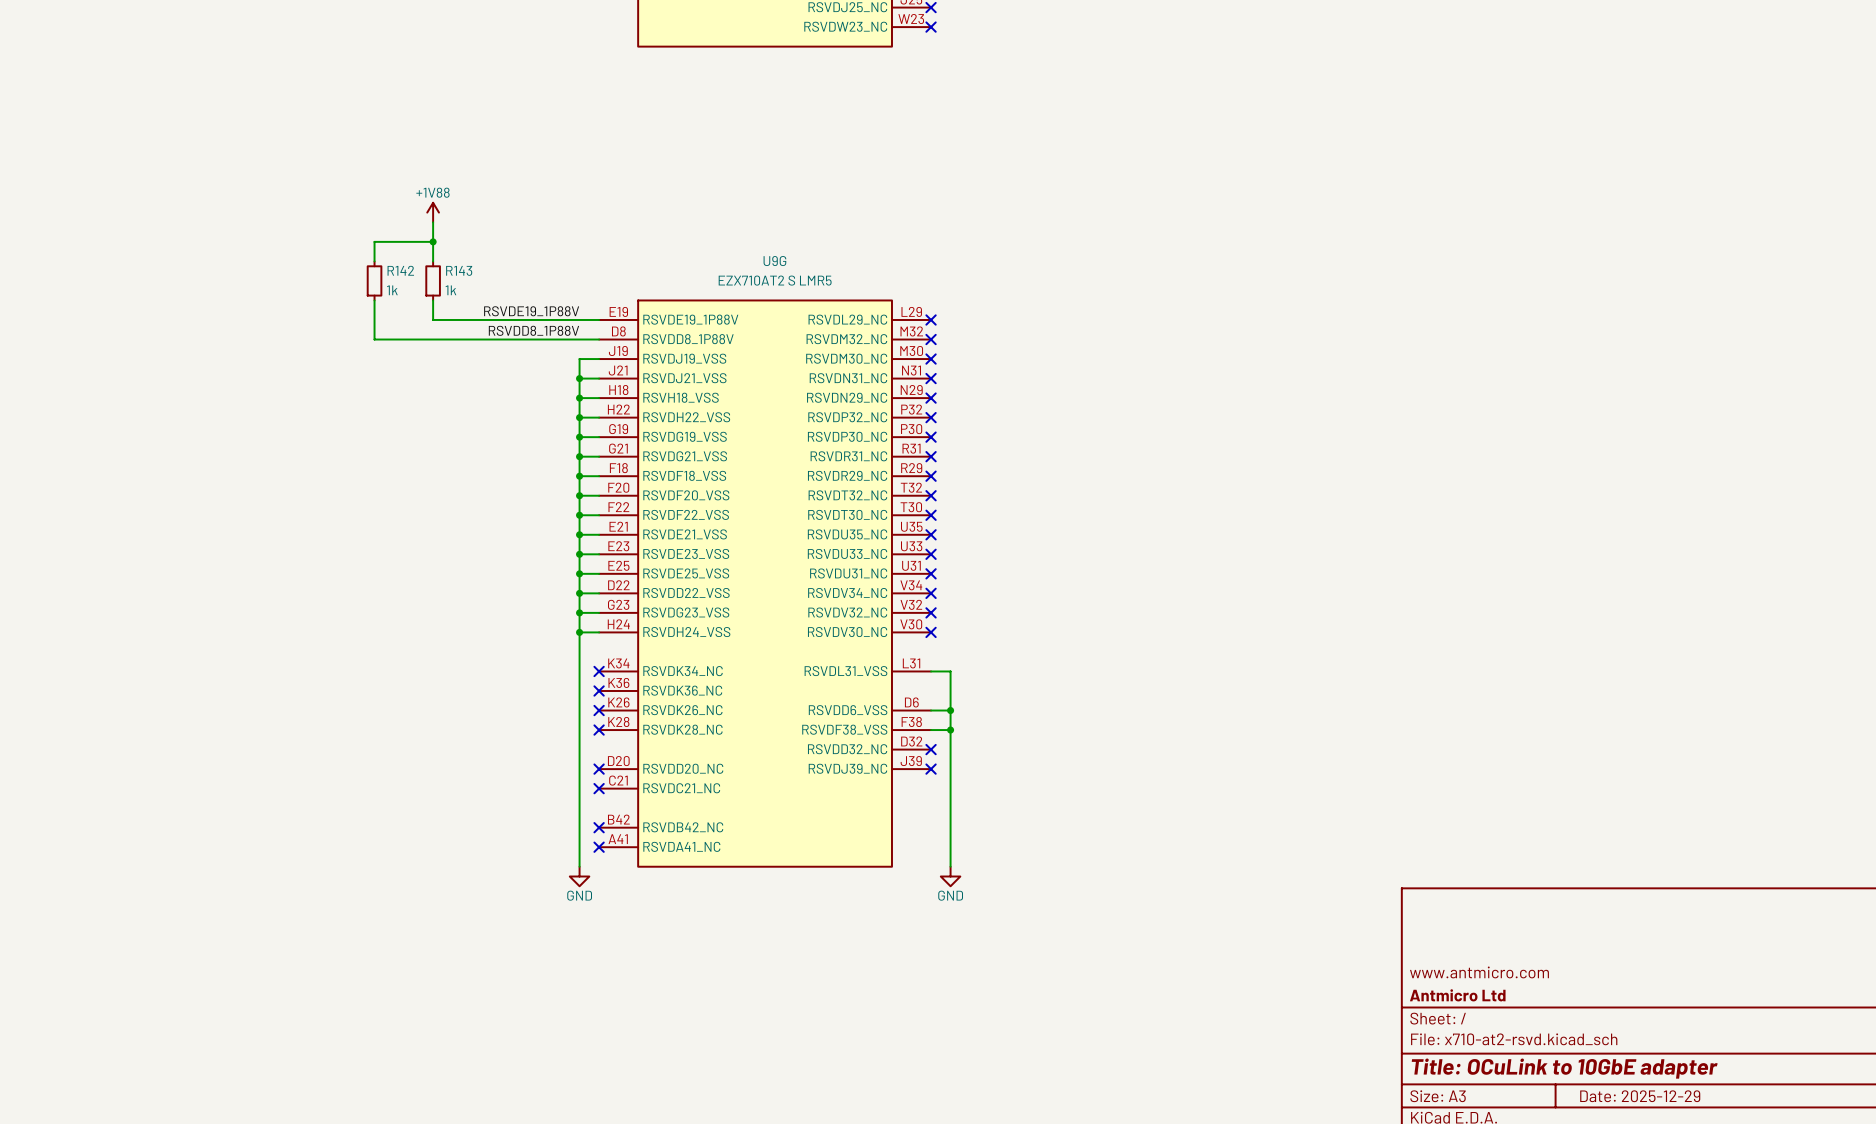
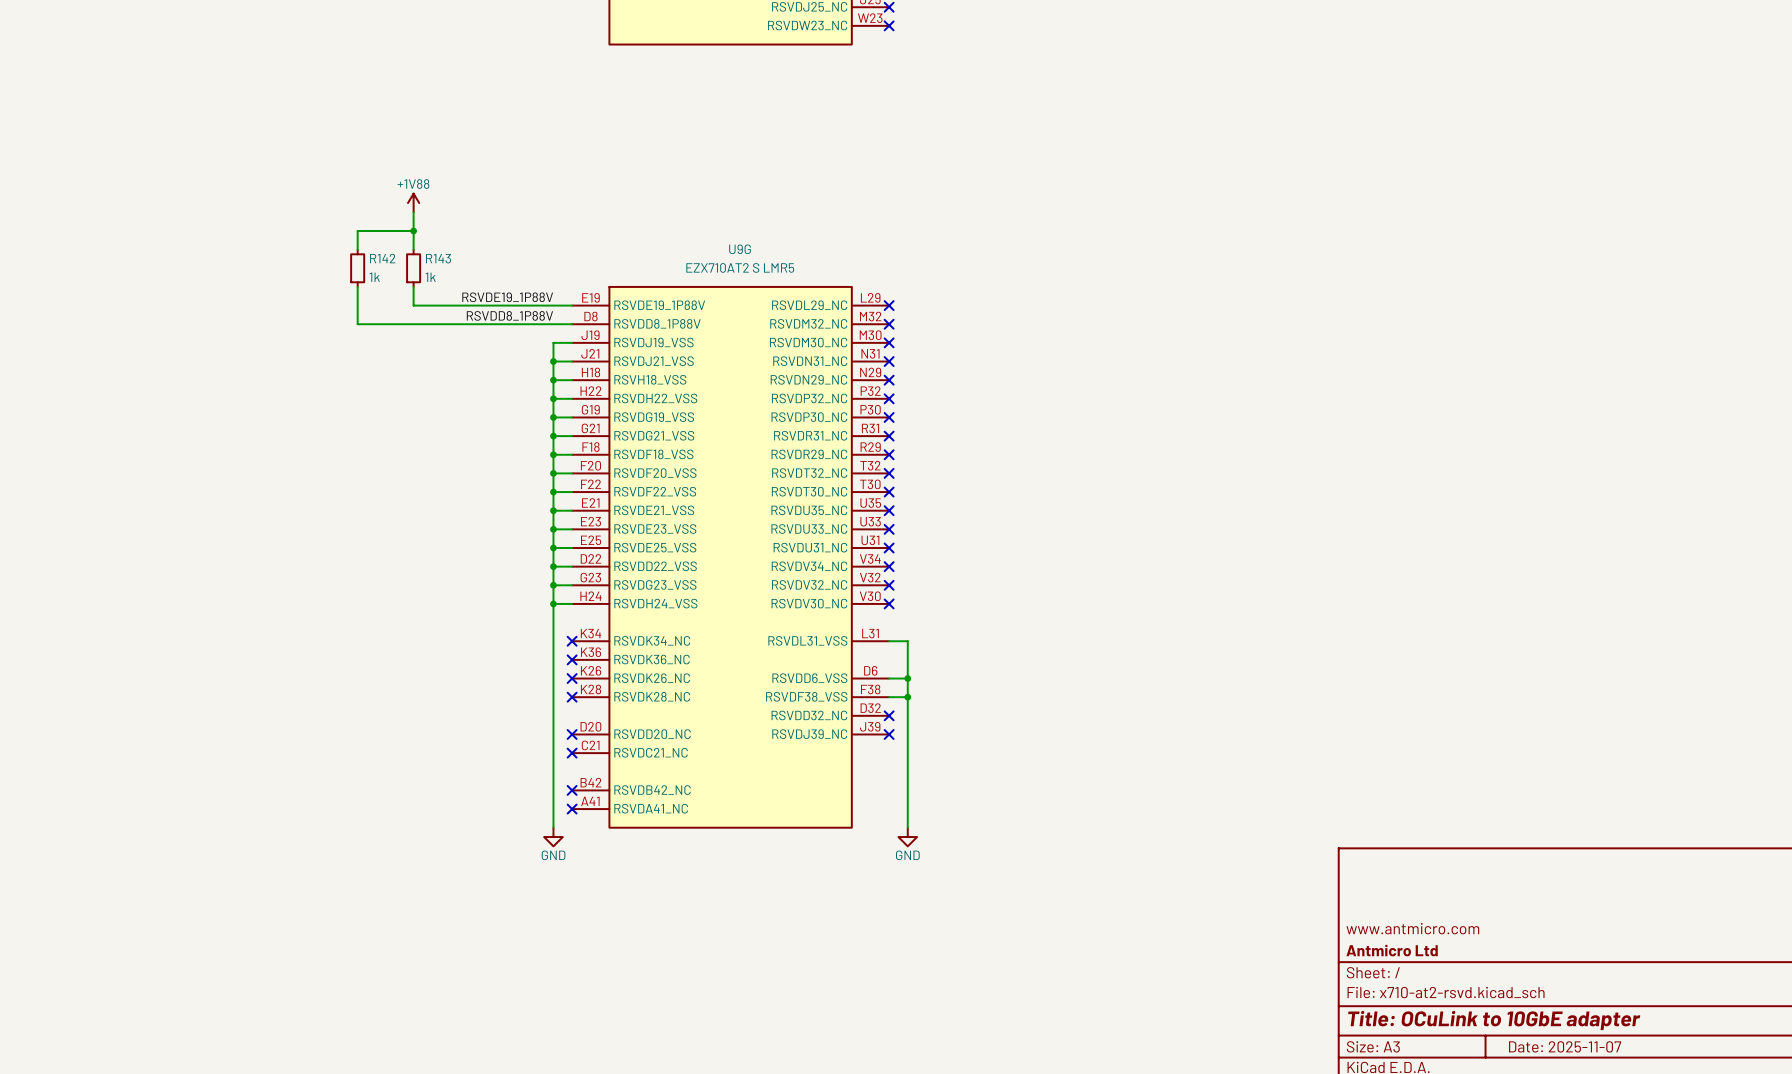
title block: Date: 2025-12-29 (1640, 1096) -> Date: 2025-11-07 (1565, 1046)

